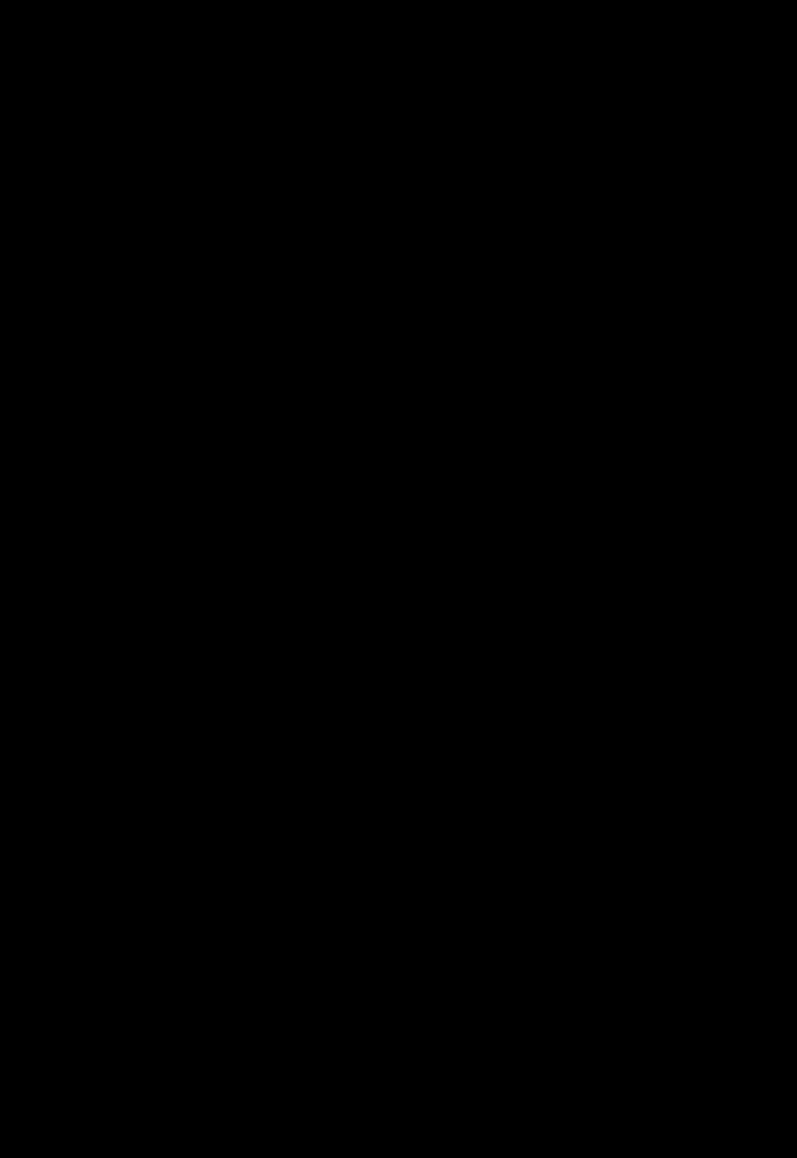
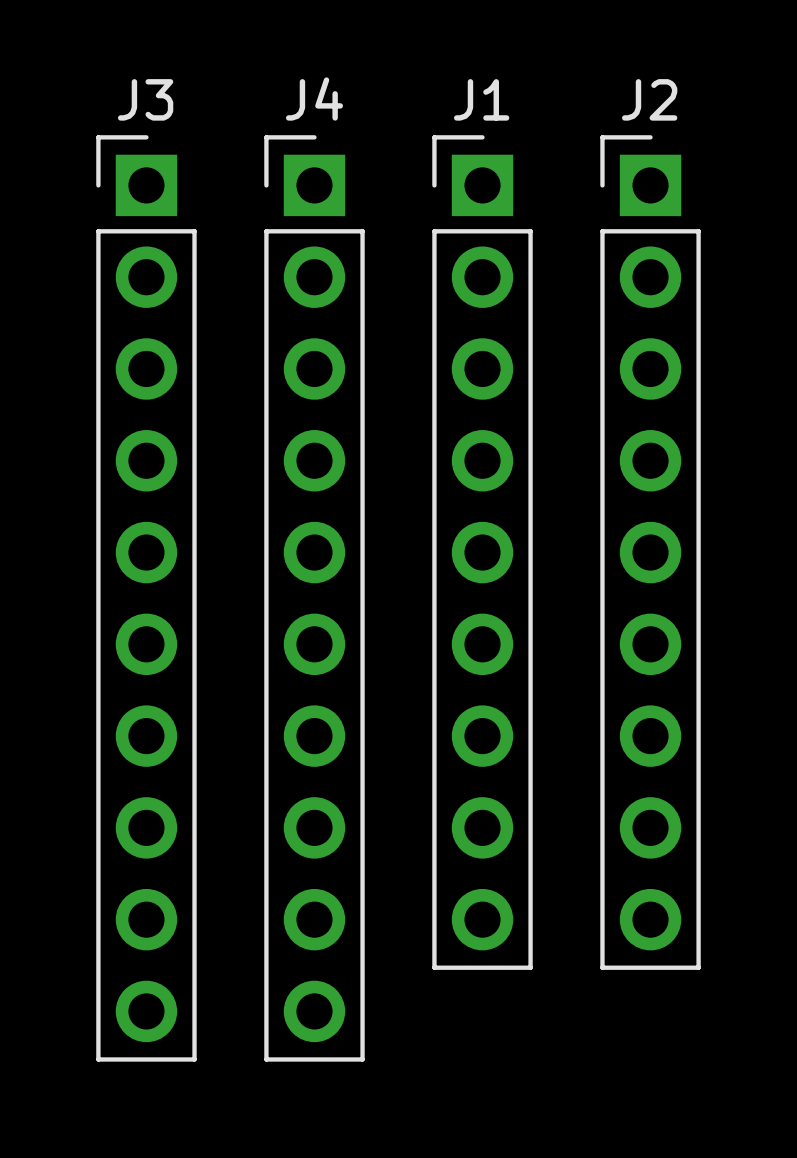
J1: none -> (482, 552)
J2: none -> (650, 552)
J3: none -> (146, 598)
J4: none -> (314, 598)

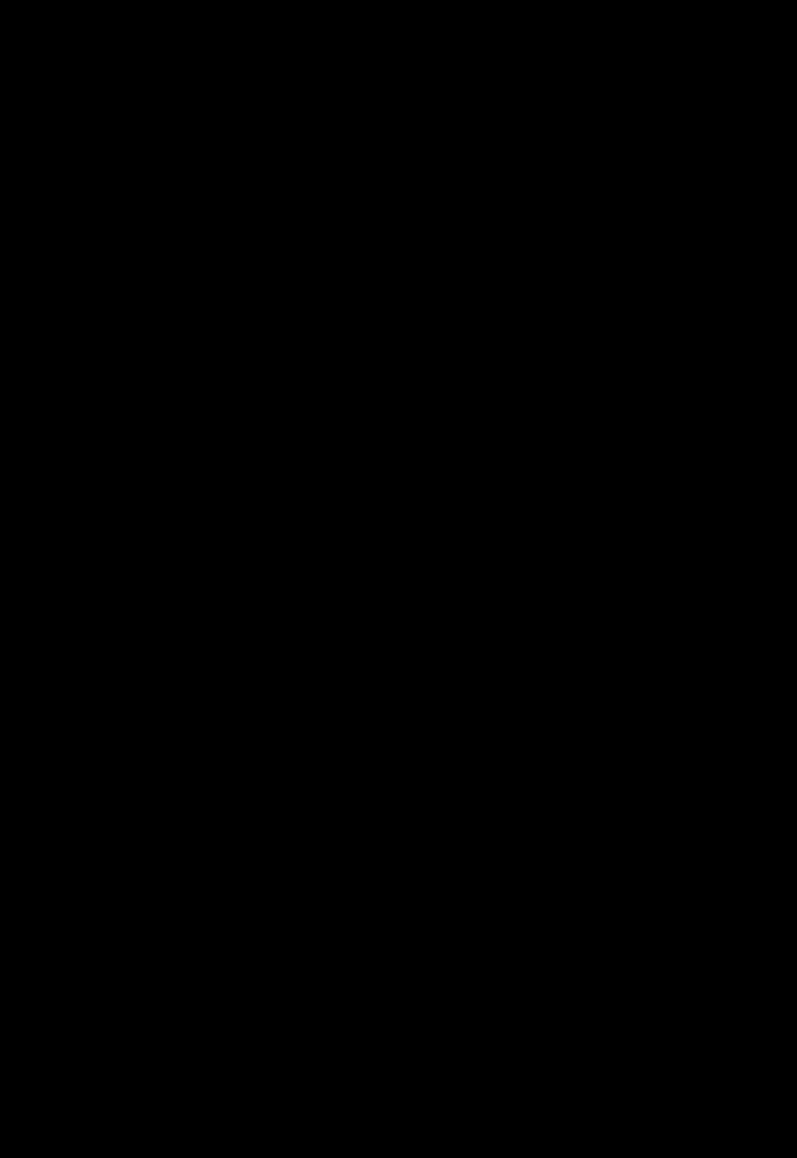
J1: (482, 552) -> none
J2: (650, 552) -> none
J3: (146, 598) -> none
J4: (314, 598) -> none

